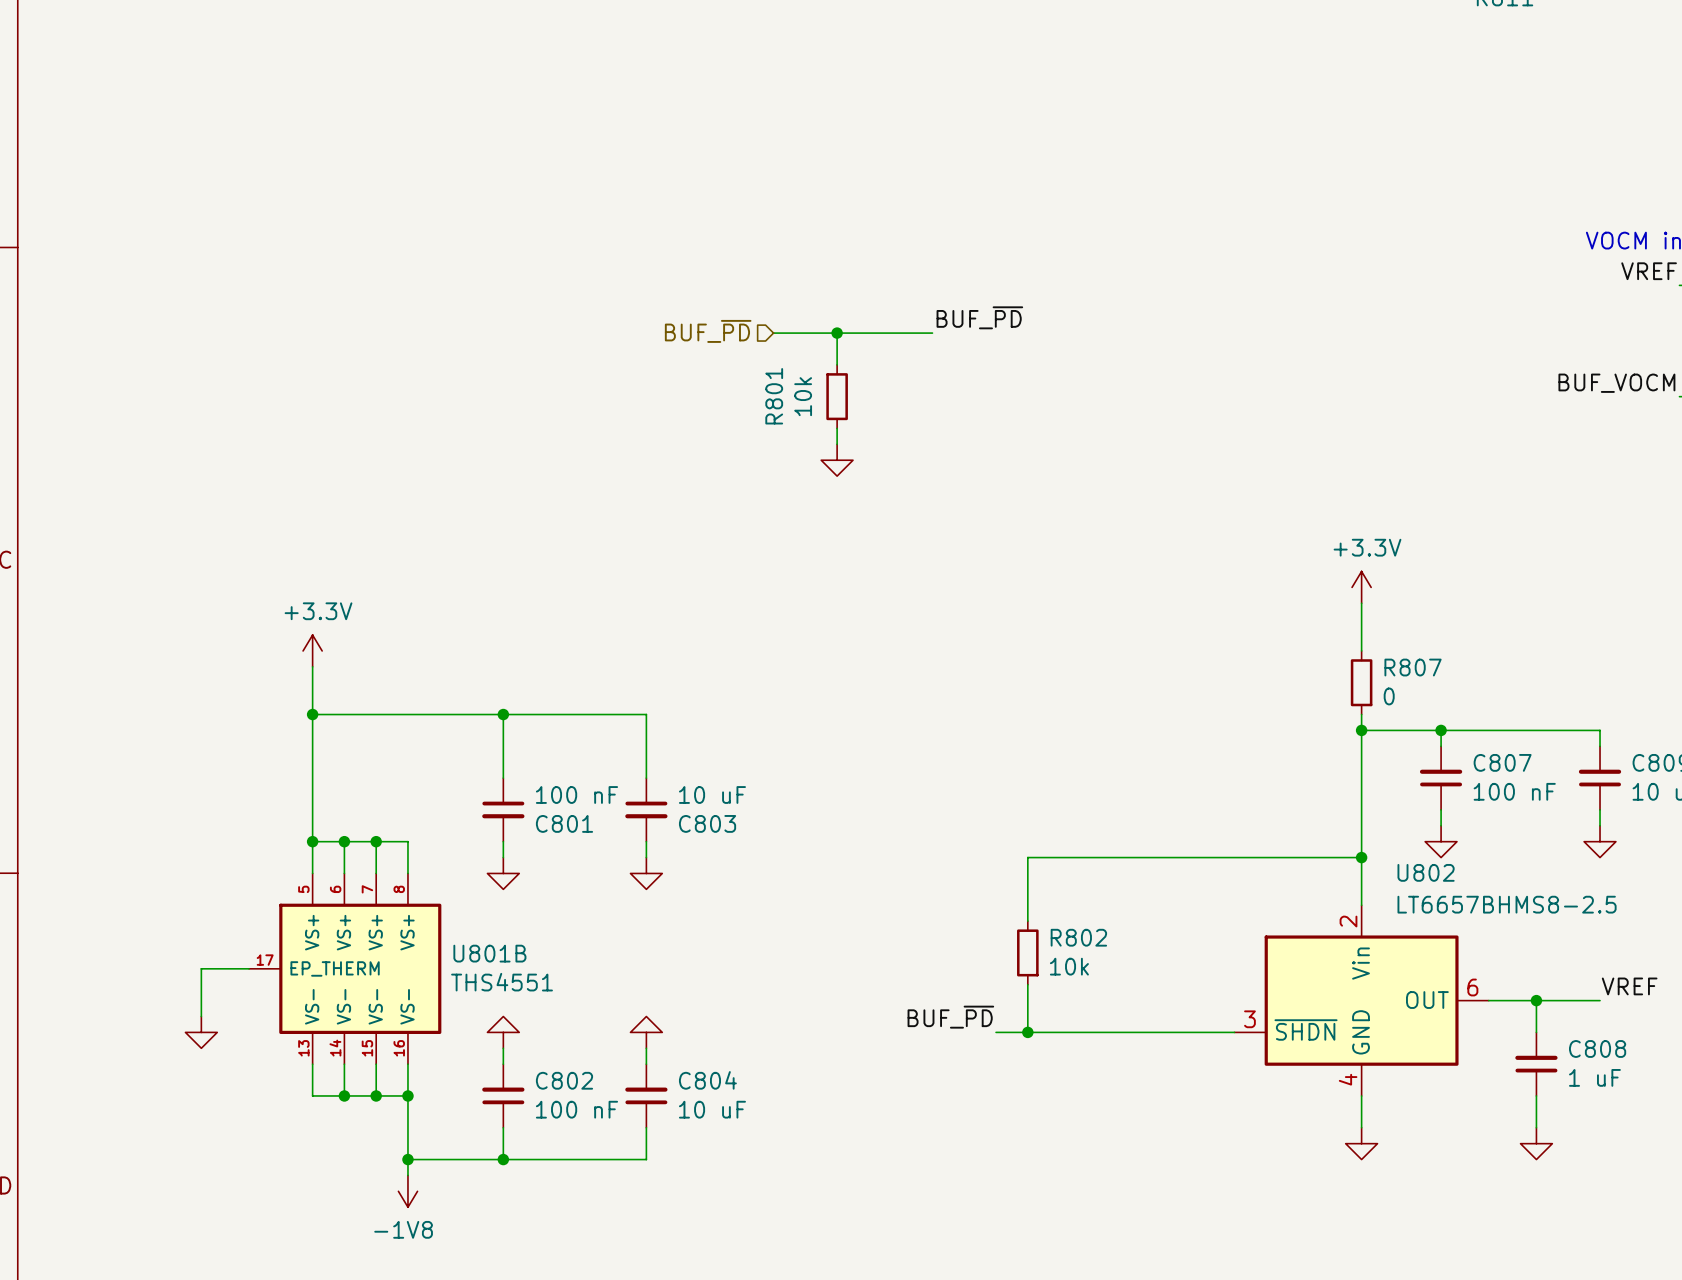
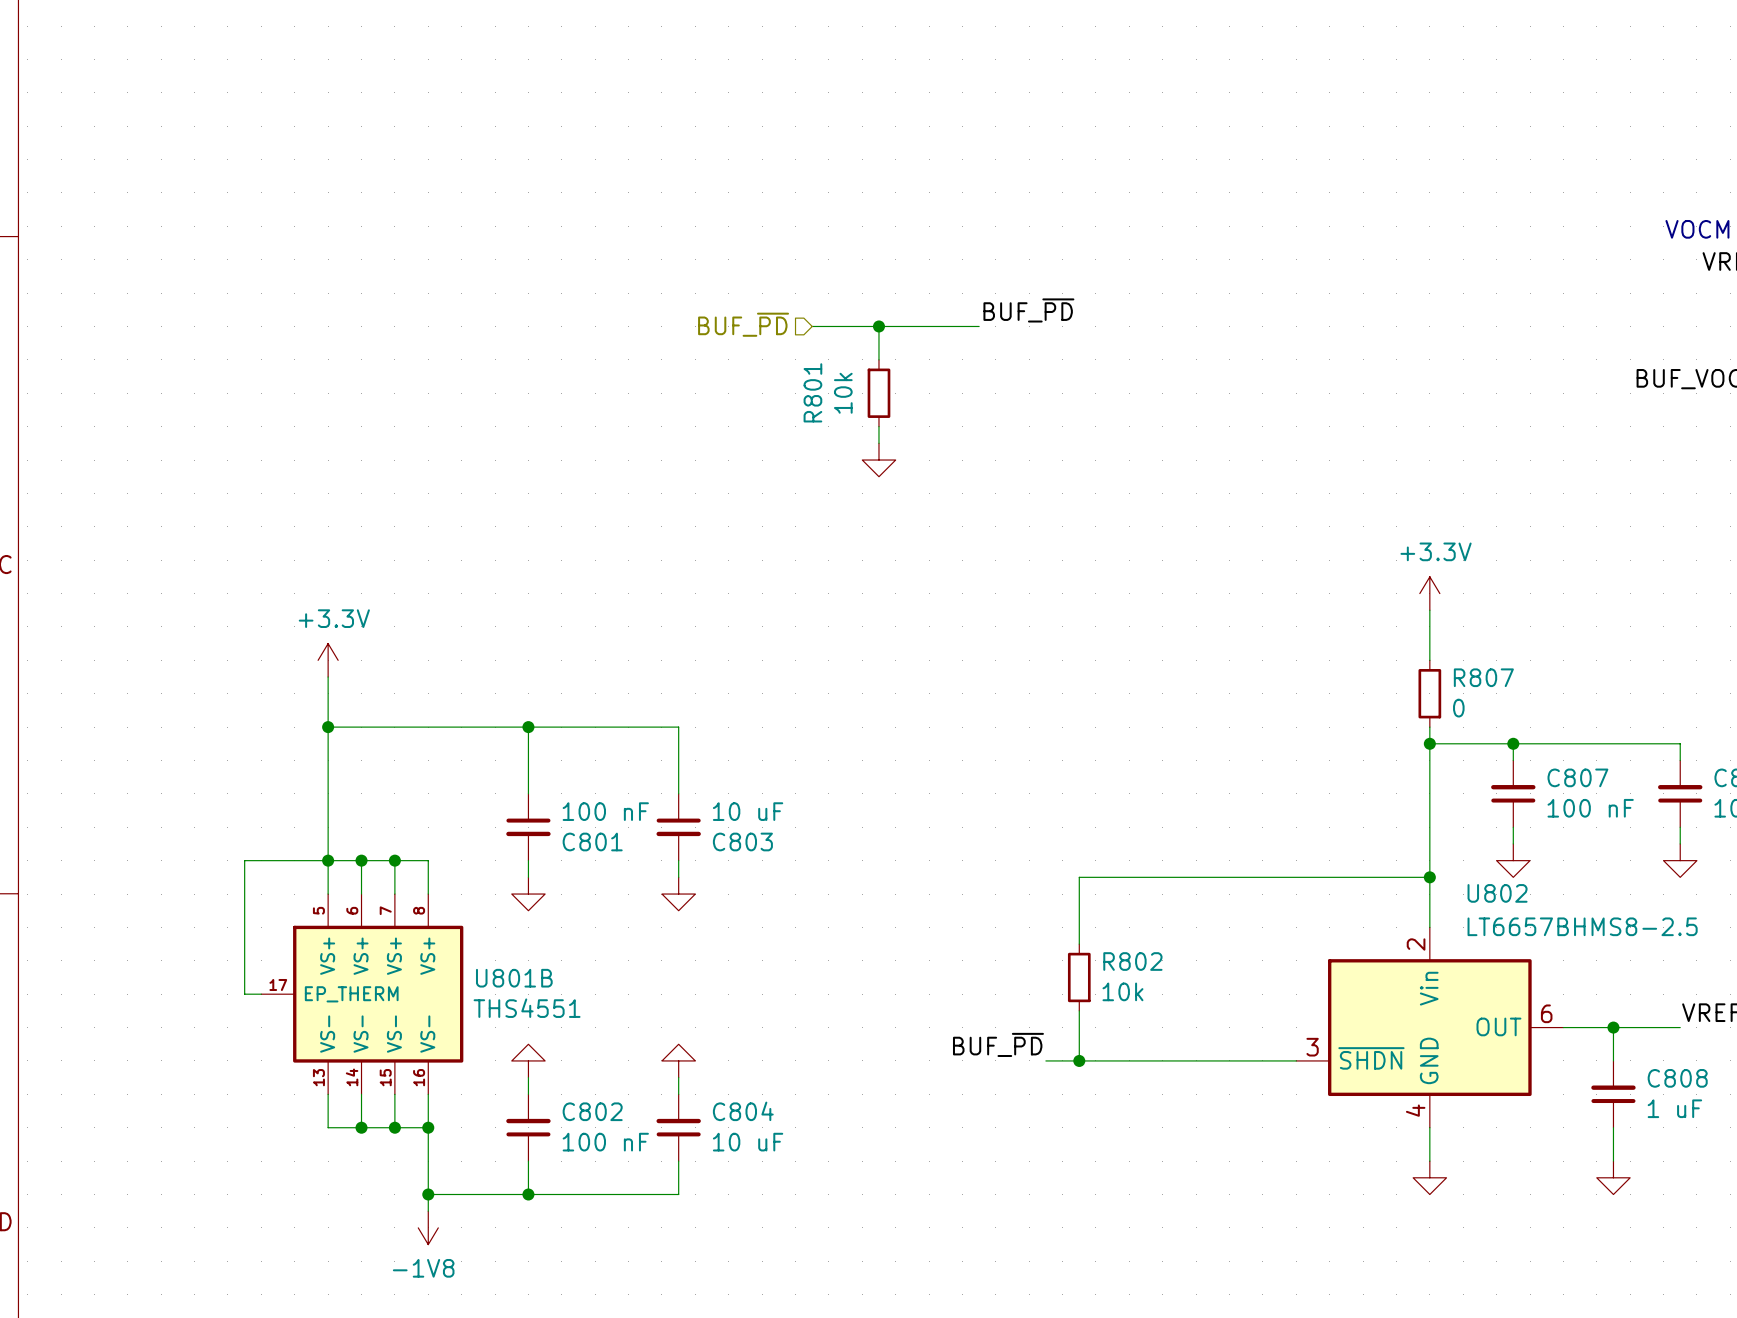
wire: (233, 968) (201, 968) (201, 1016) -> (244, 994) (244, 860) (328, 860)
power symbol: (201, 1032) -> none

